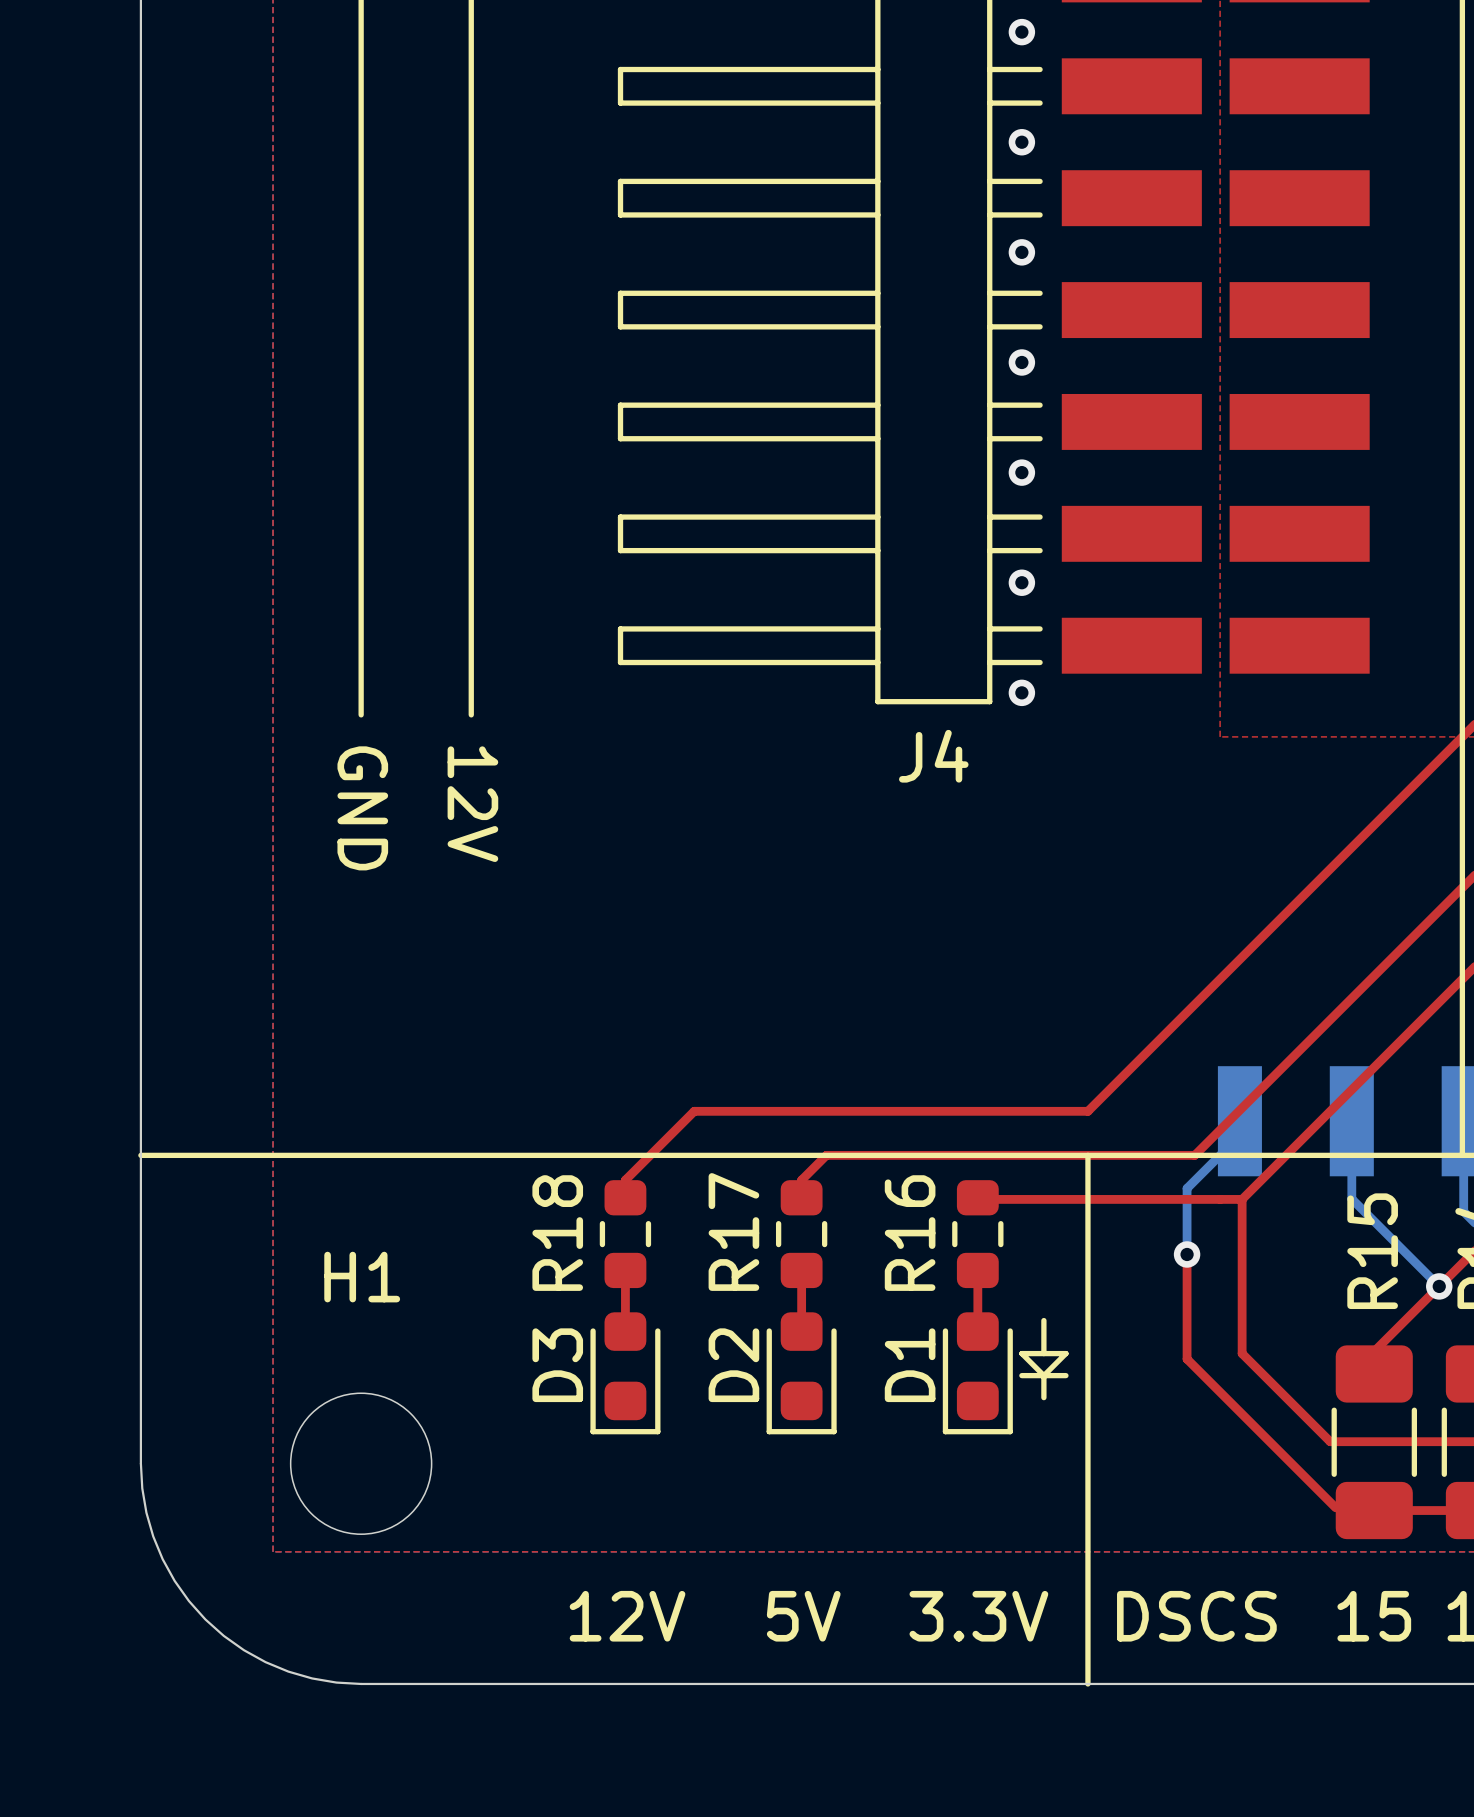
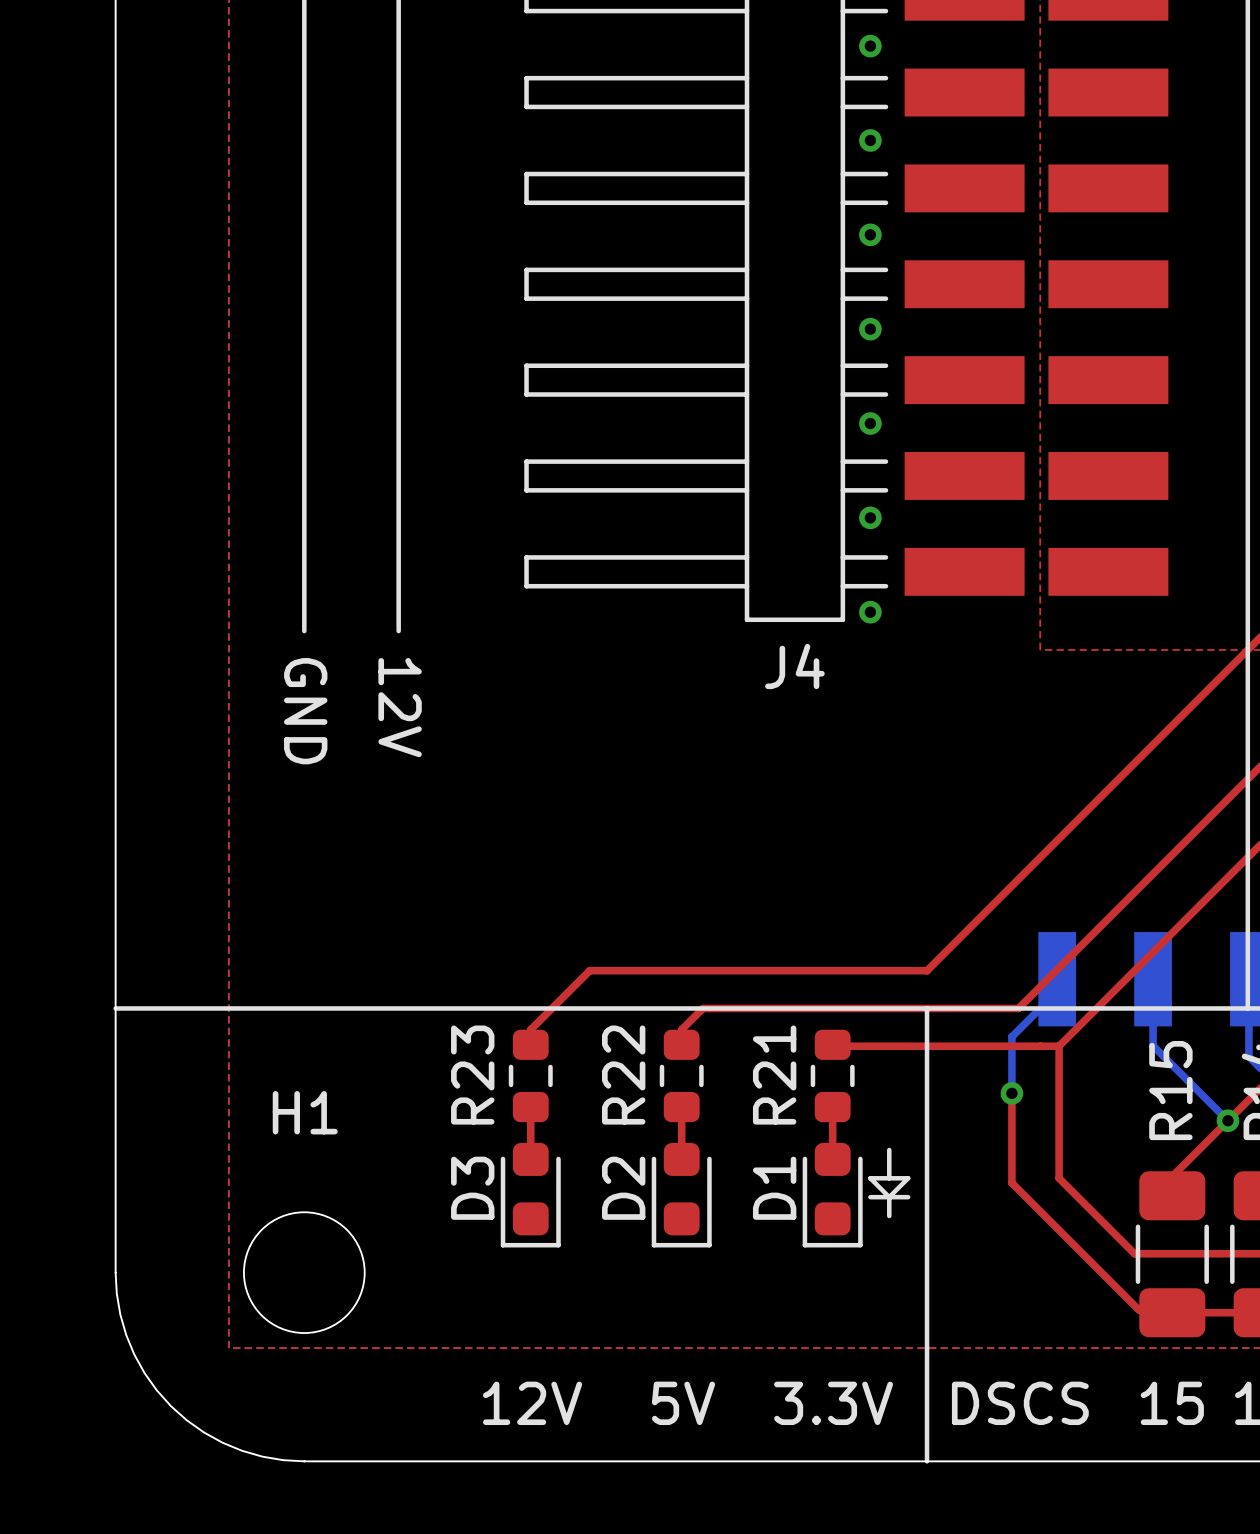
R17 name: R17 (733, 1232) -> R22 (623, 1075)
R18 name: R18 (557, 1233) -> R23 (472, 1075)
R16 name: R16 (910, 1233) -> R21 (774, 1075)

